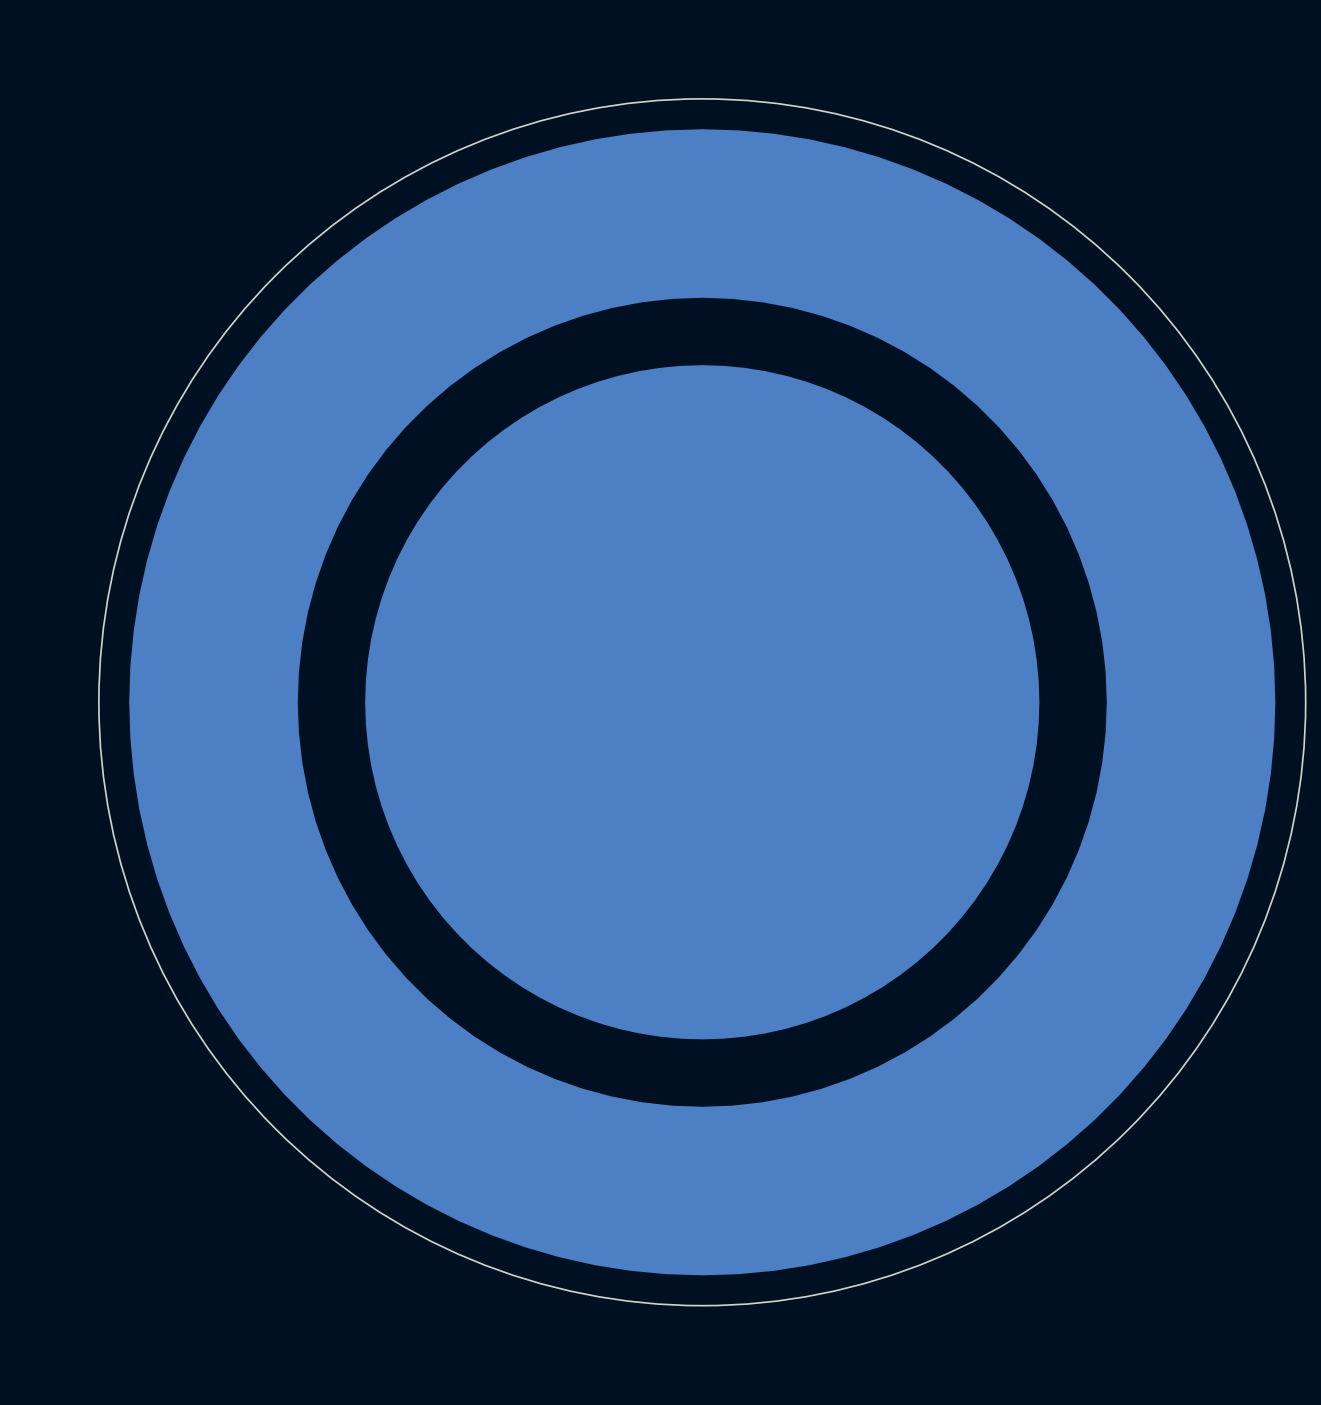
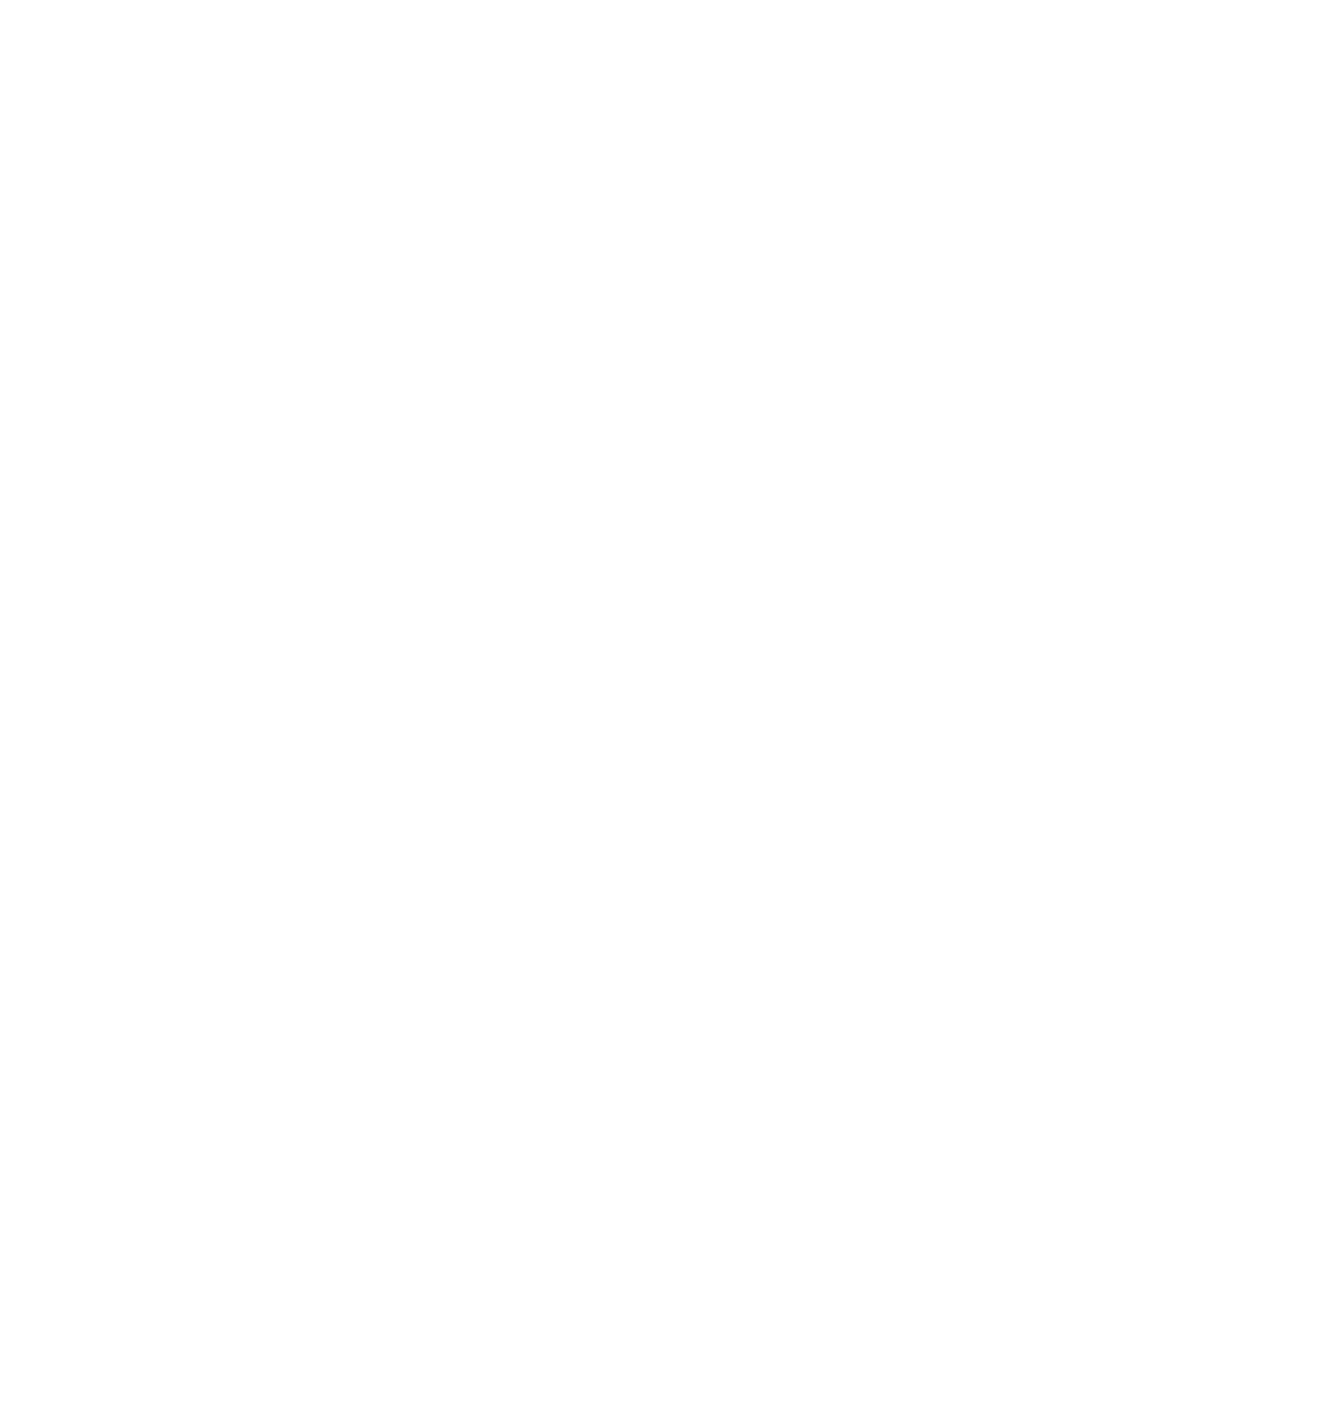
round board edge: [98, 98, 1307, 1307] -> none
part: (702, 702) -> none

